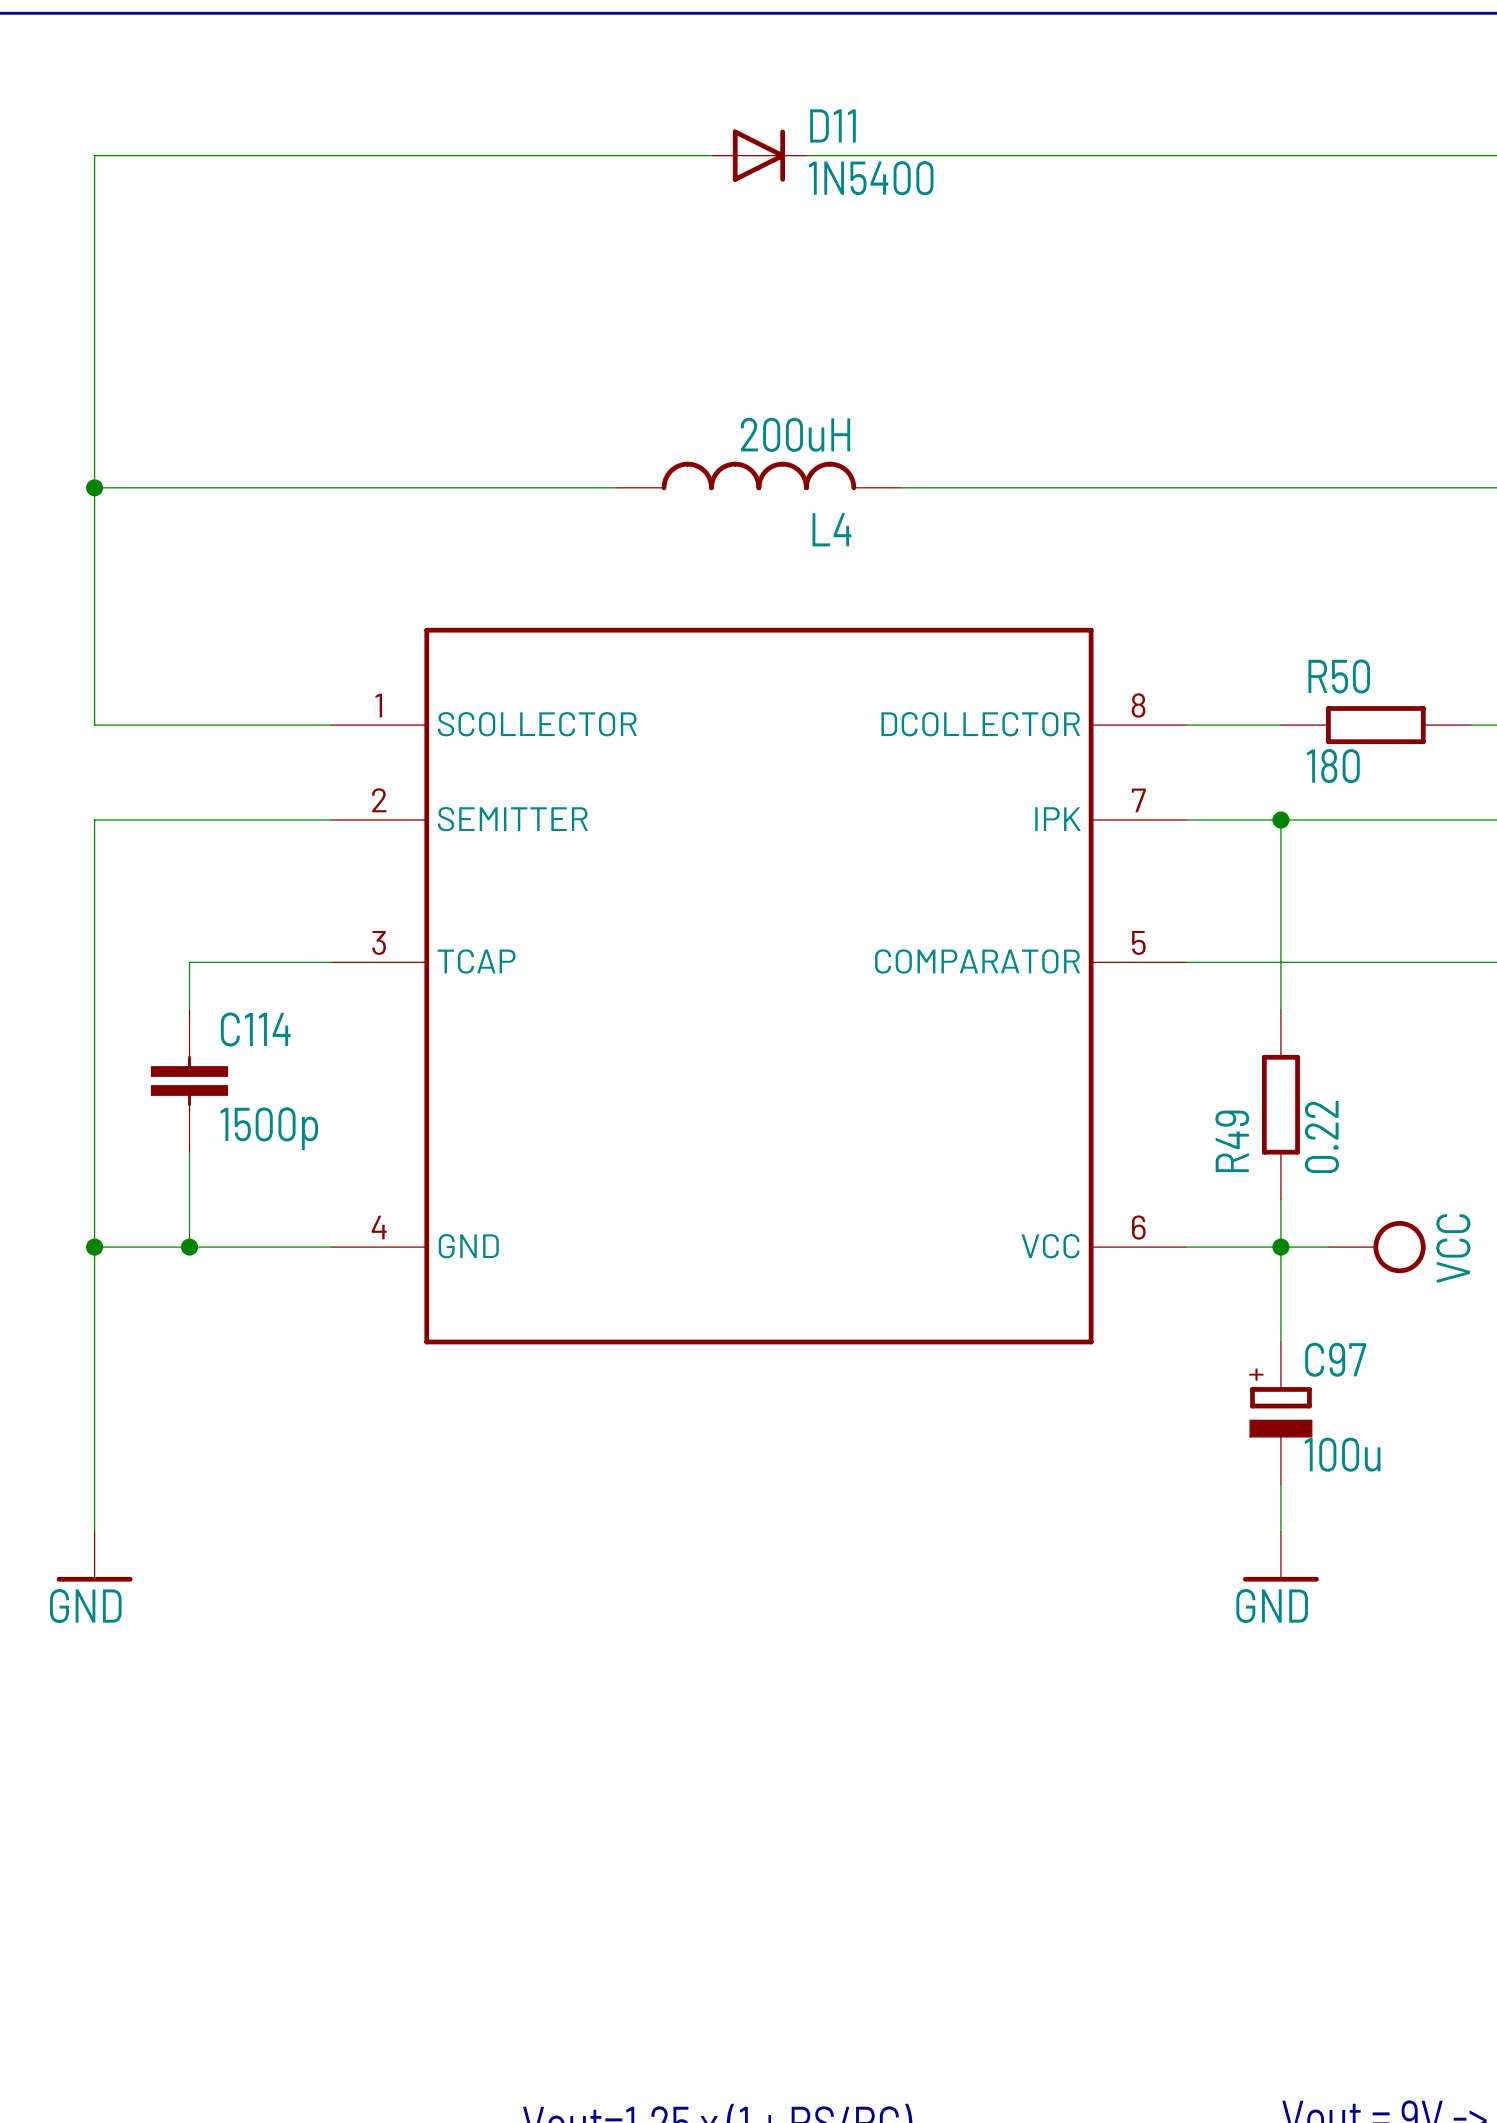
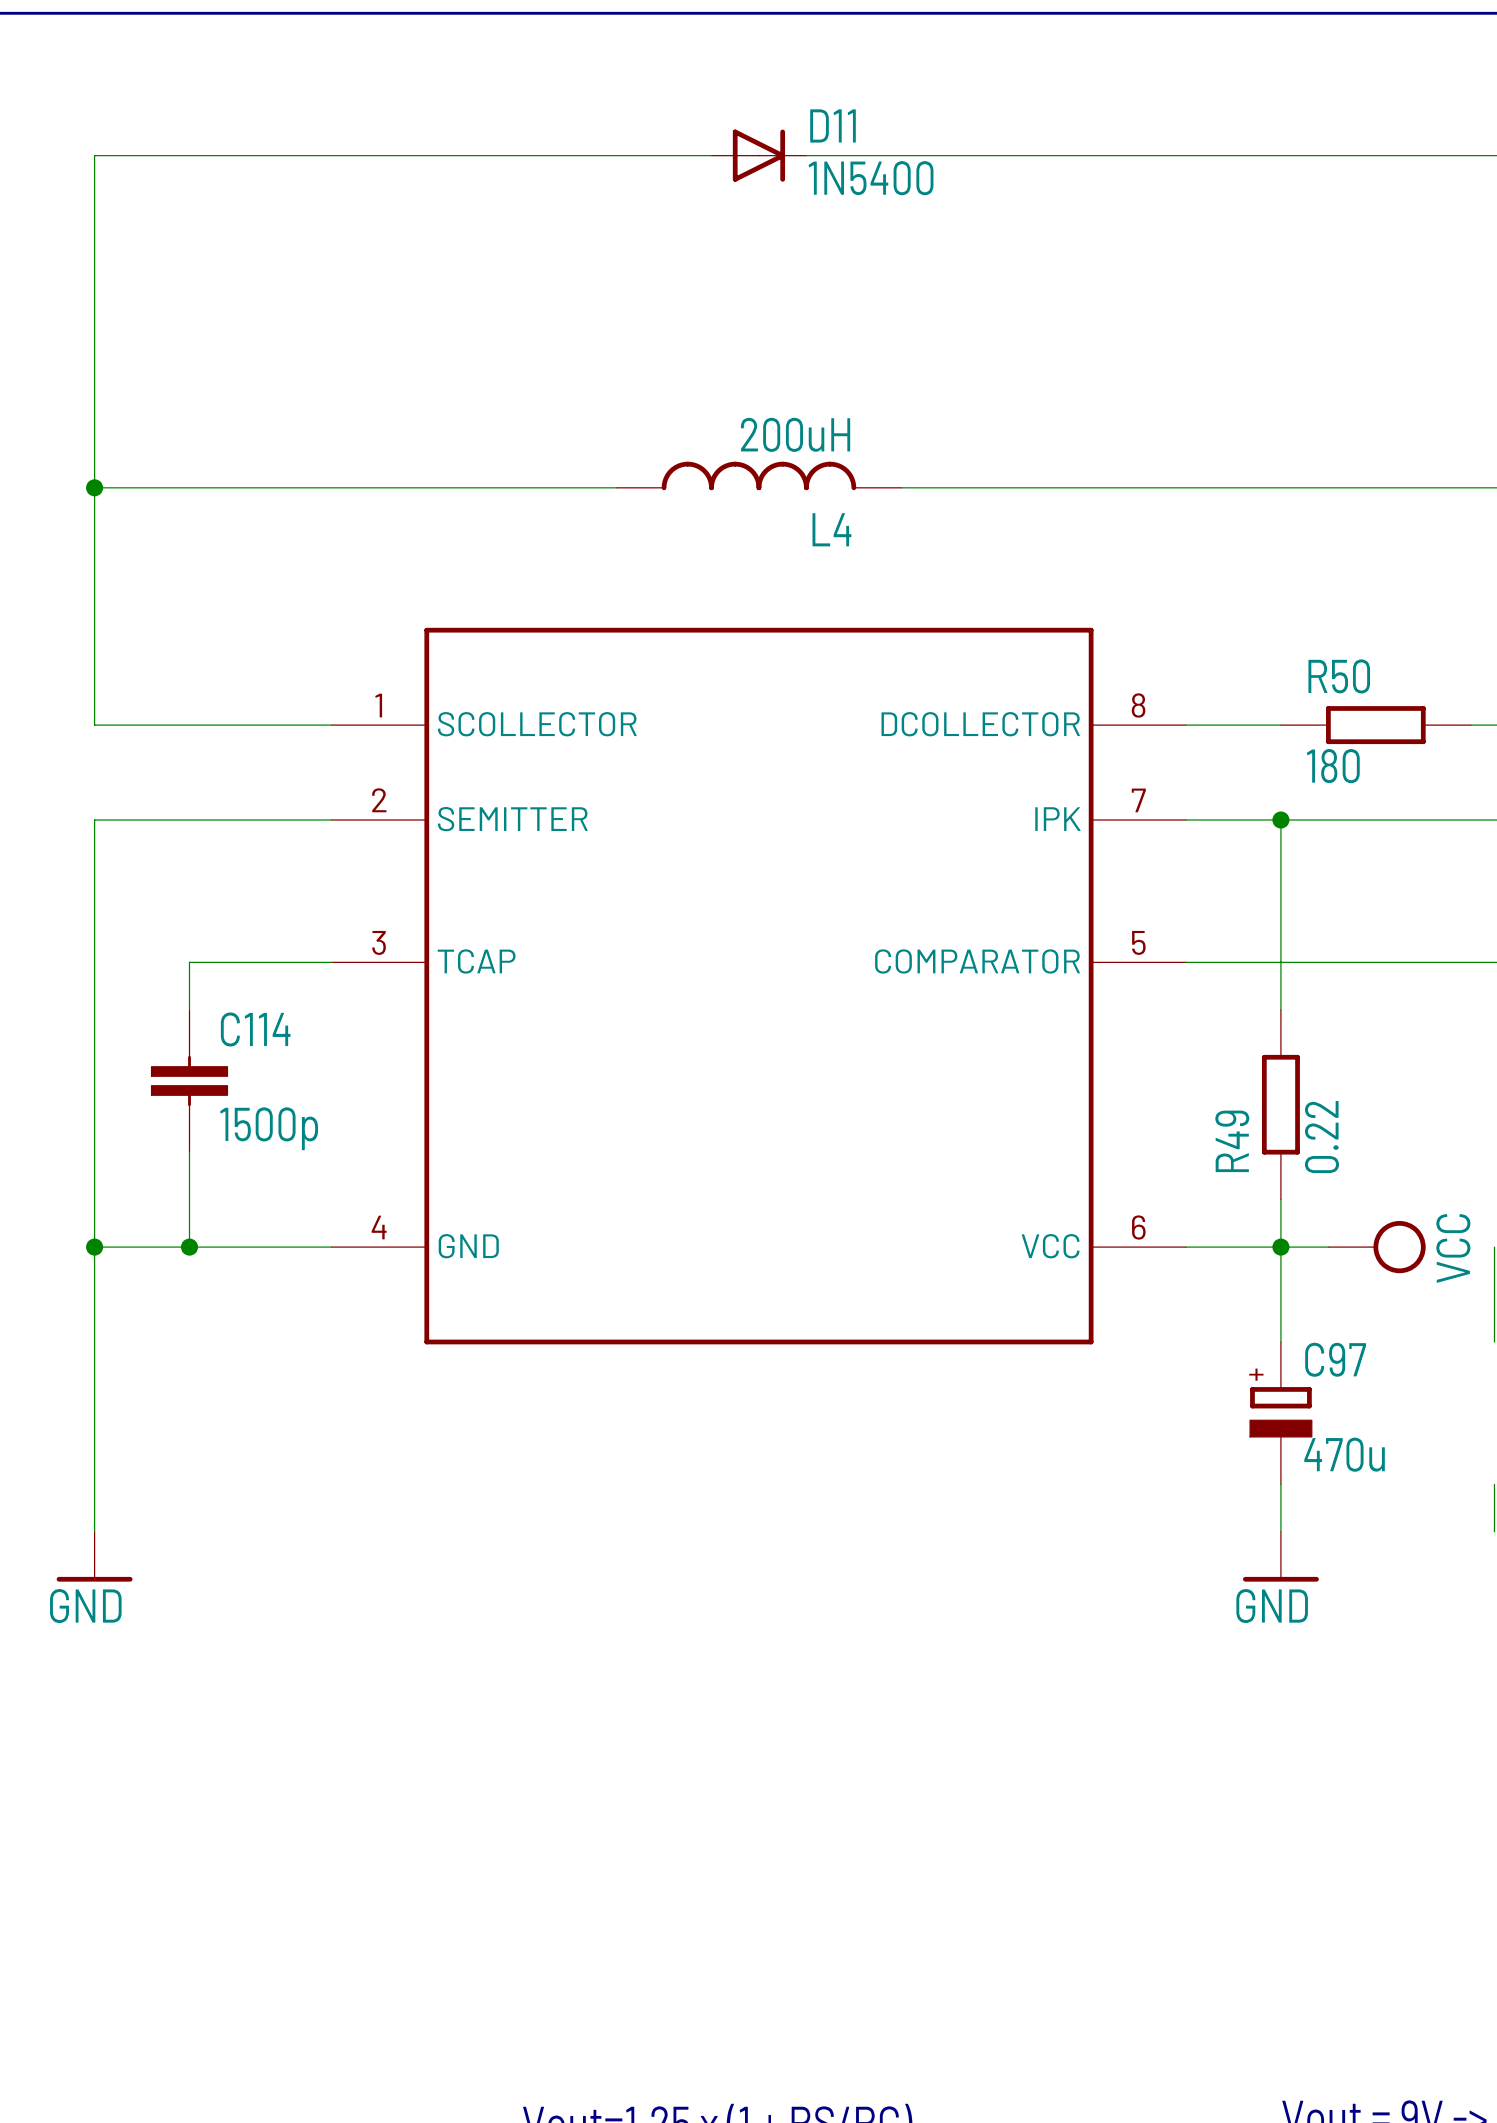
wire: none -> (1494, 1247) (1494, 1341)
C97 value: 100u (1342, 1454) -> 470u (1344, 1454)
wire: none -> (1494, 1484) (1494, 1531)

